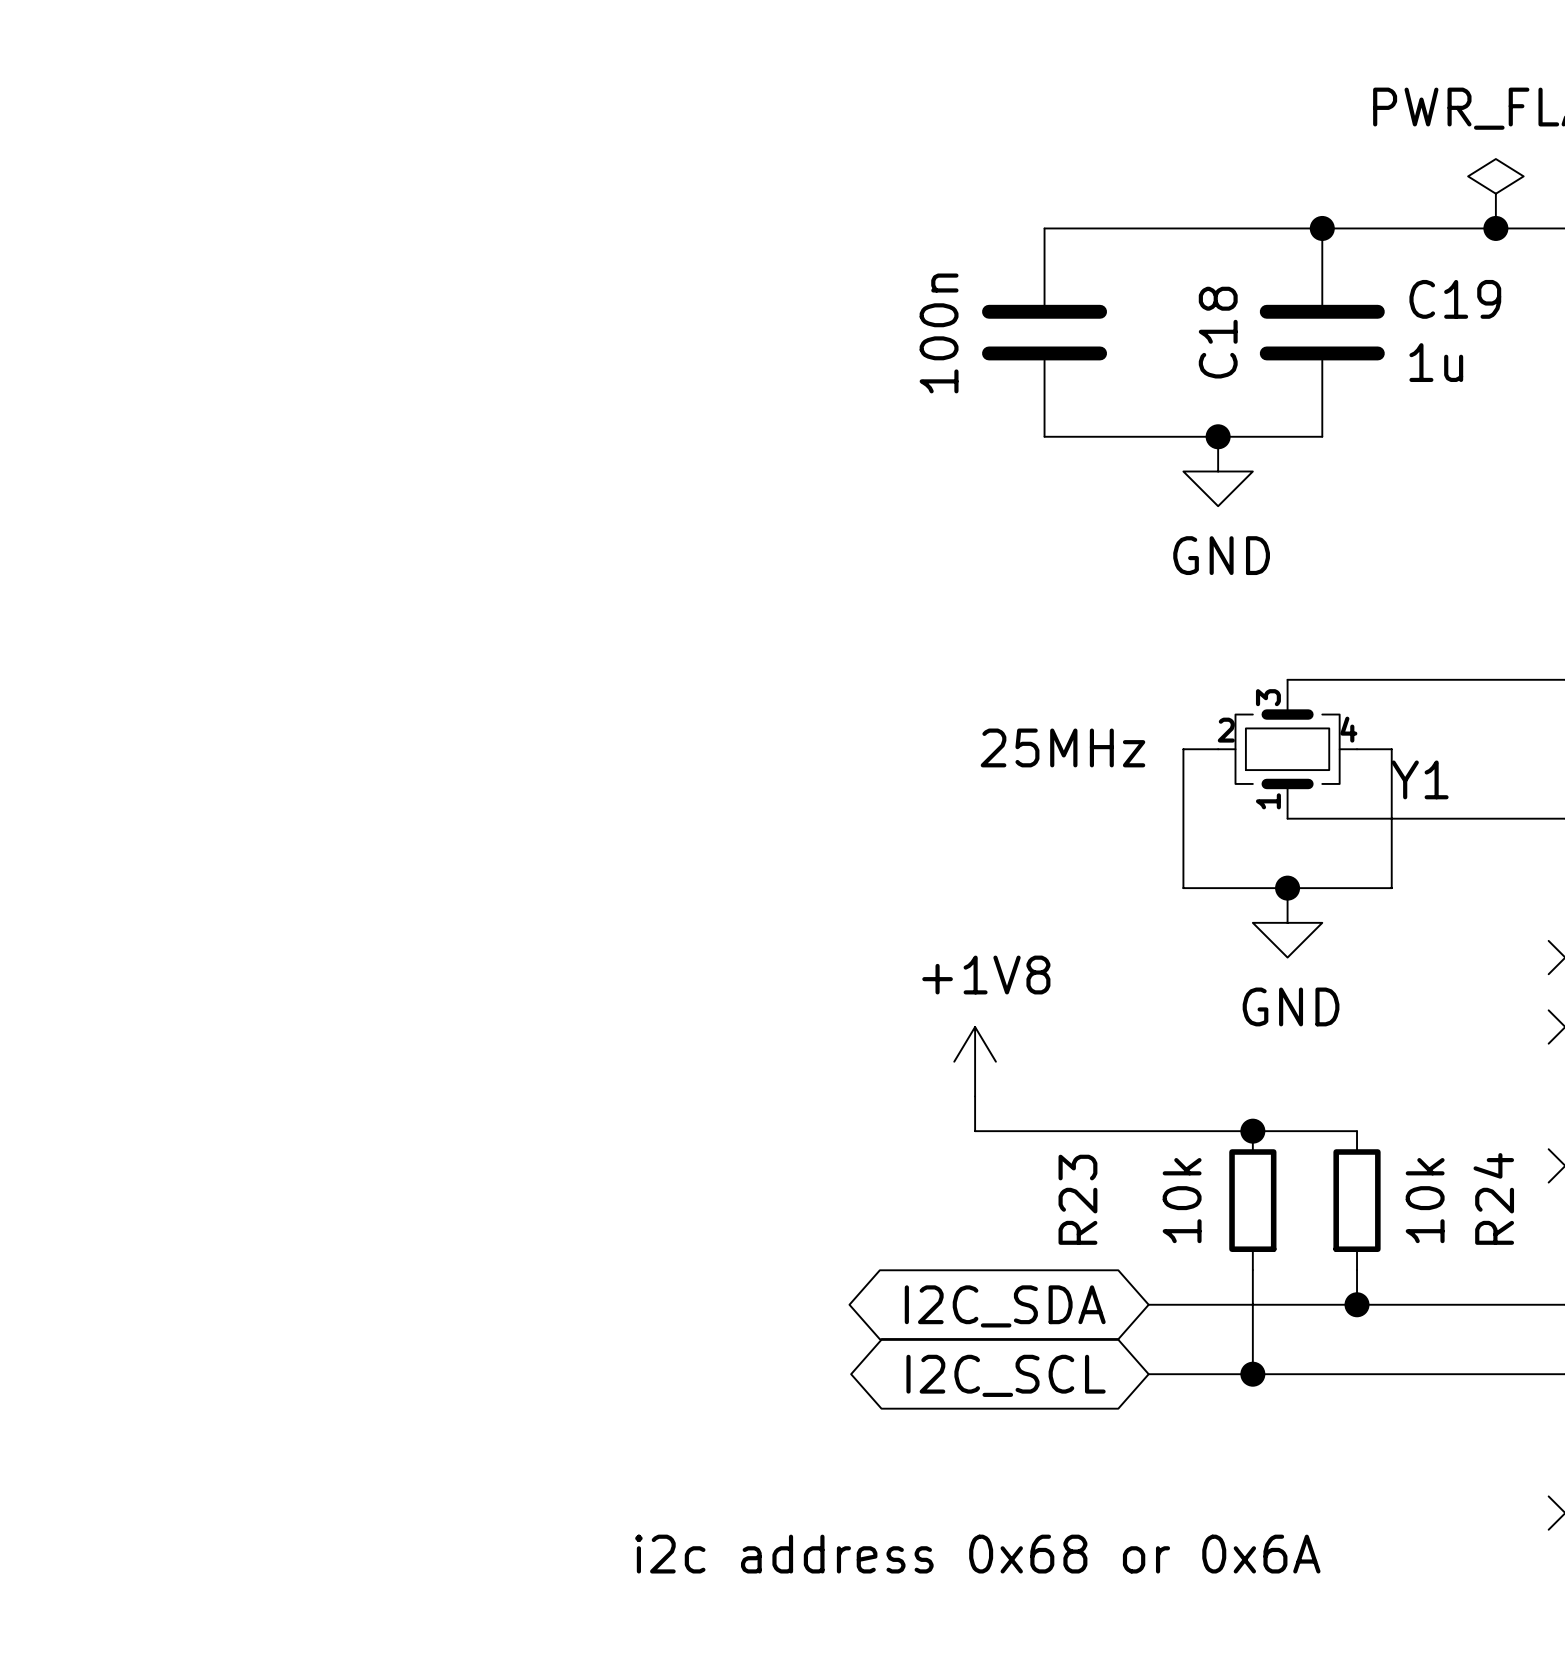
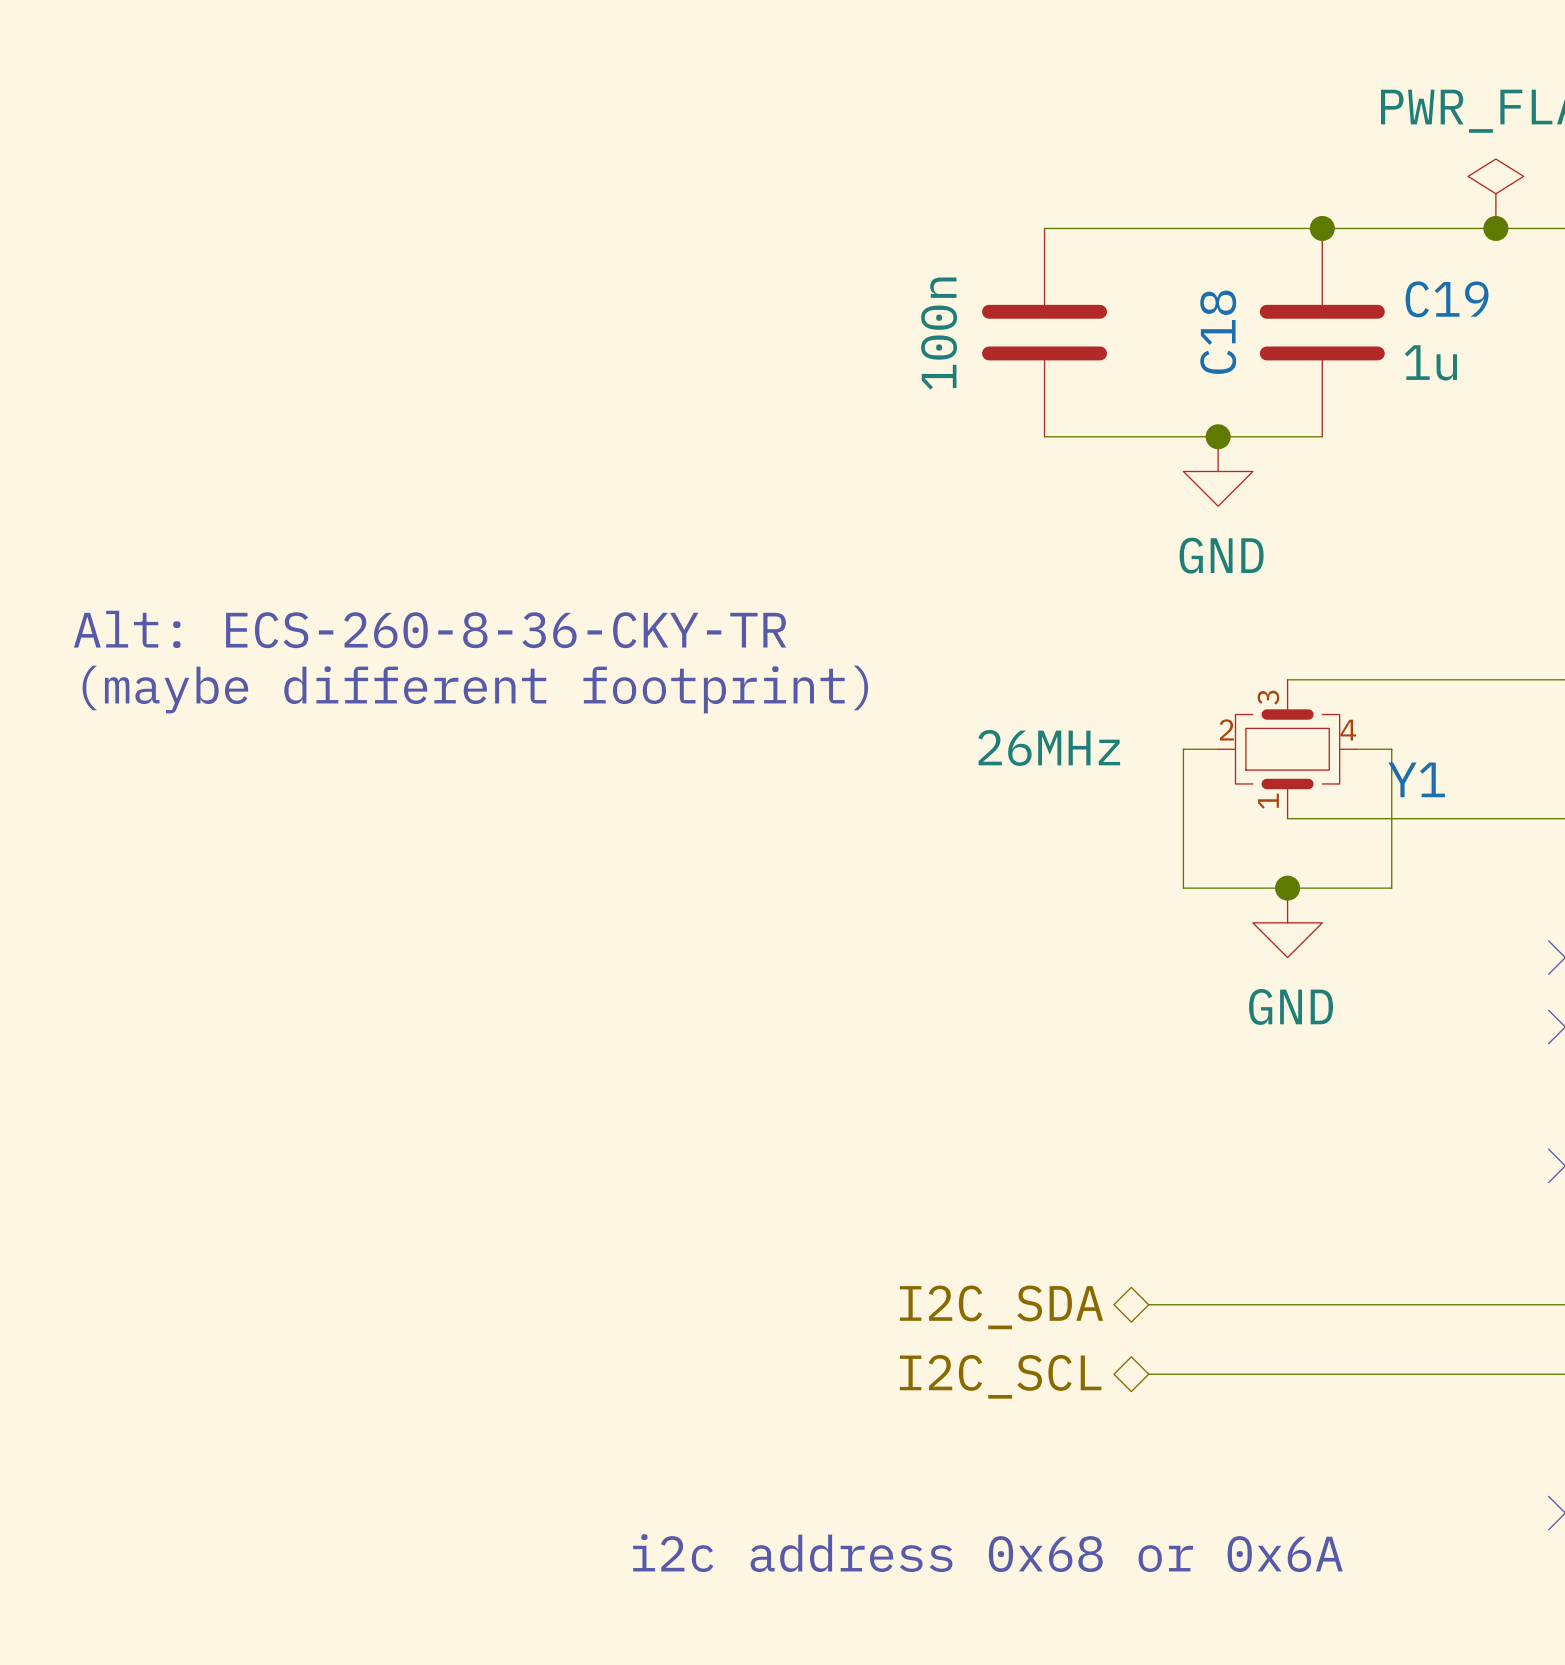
text: none -> Alt: ECS-260-8-36-CKY-TR (430, 629)
text: none -> (maybe different footprint) (475, 689)
Y1 value: 25MHz (1062, 747) -> 26MHz (1049, 747)
power symbol: +1V8 (975, 1061) -> none
wire: (975, 1096) (975, 1131) (1357, 1131) -> none
junction: (1252, 1131) -> none
R23: 10k (1252, 1200) -> none
R24: 10k (1357, 1200) -> none
wire: (1252, 1270) (1252, 1374) -> none
wire: (1357, 1270) (1357, 1304) -> none
junction: (1357, 1304) -> none
hierarchical label: none -> I2C_SDA (1001, 1307)
global label: I2C_SDA (1005, 1306) -> none
hierarchical label: none -> I2C_SCL (1000, 1376)
junction: (1252, 1374) -> none
global label: I2C_SCL (1006, 1375) -> none

